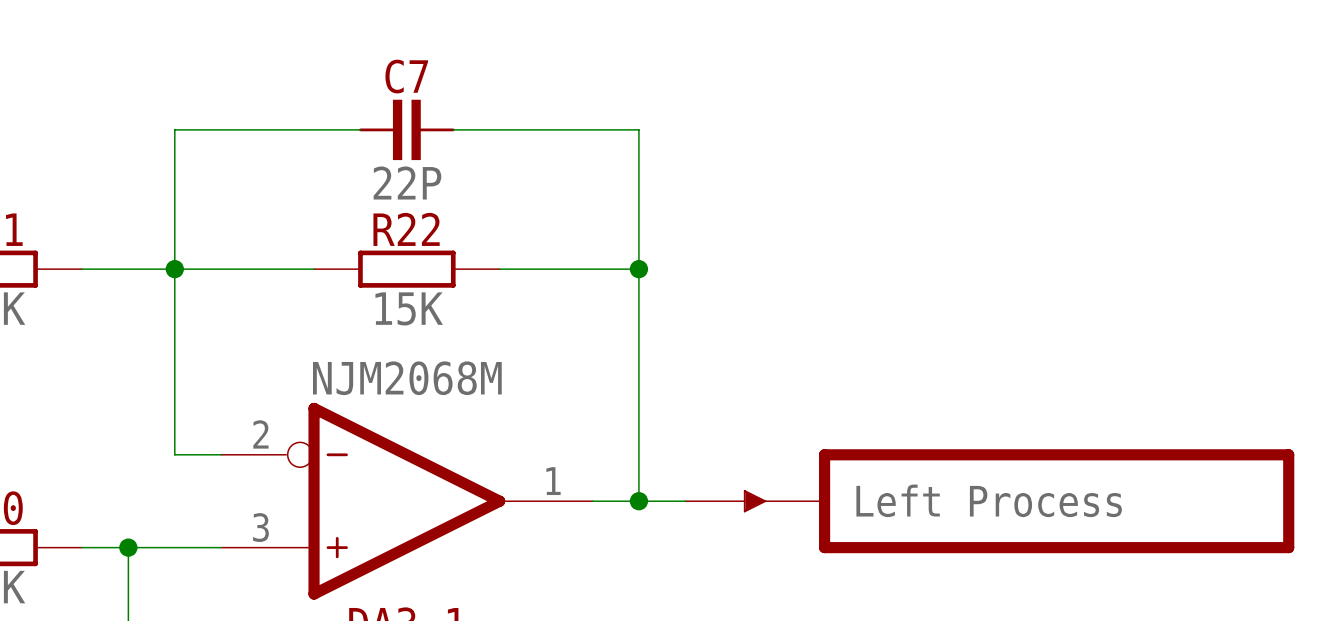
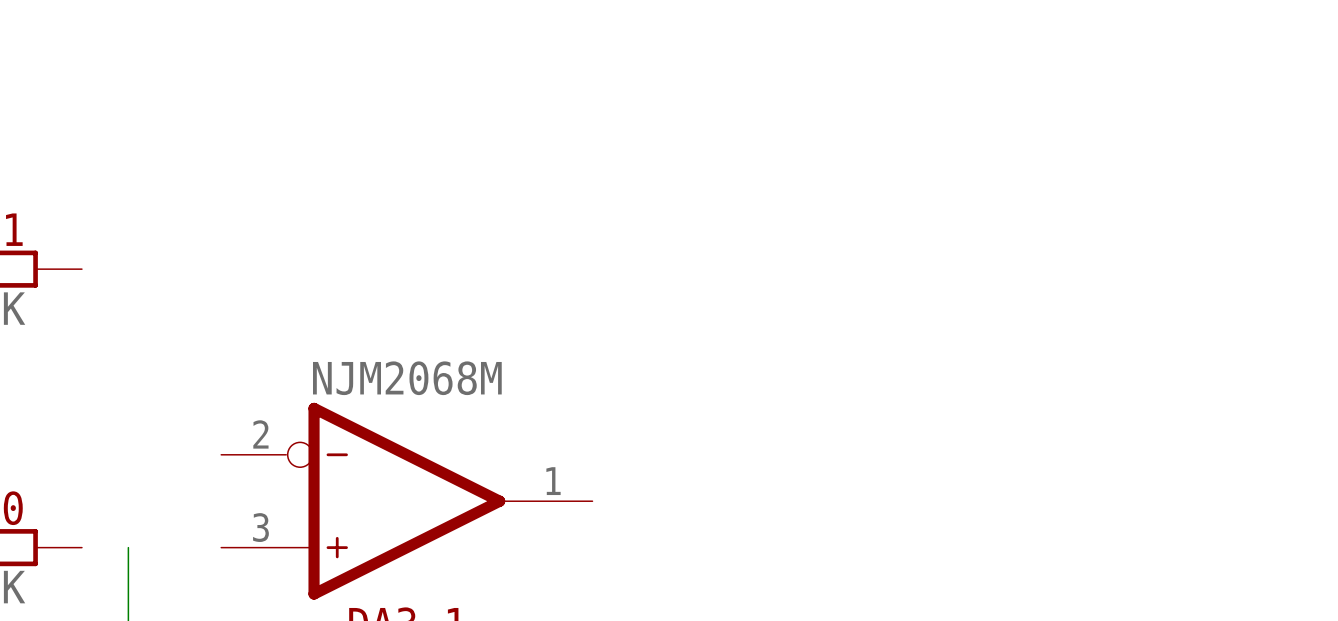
wire: (360, 129) (174, 129) (174, 454) (221, 454) -> none
C7: 22P (406, 129) -> none
wire: (453, 129) (638, 129) (638, 501) -> none
wire: (81, 269) (314, 269) -> none
junction: (174, 269) -> none
R22: 15K (406, 269) -> none
wire: (499, 269) (638, 269) -> none
junction: (638, 269) -> none
wire: (592, 501) (685, 501) -> none
junction: (638, 501) -> none
part: (989, 501) -> none
wire: (81, 547) (221, 547) -> none
junction: (128, 547) -> none

